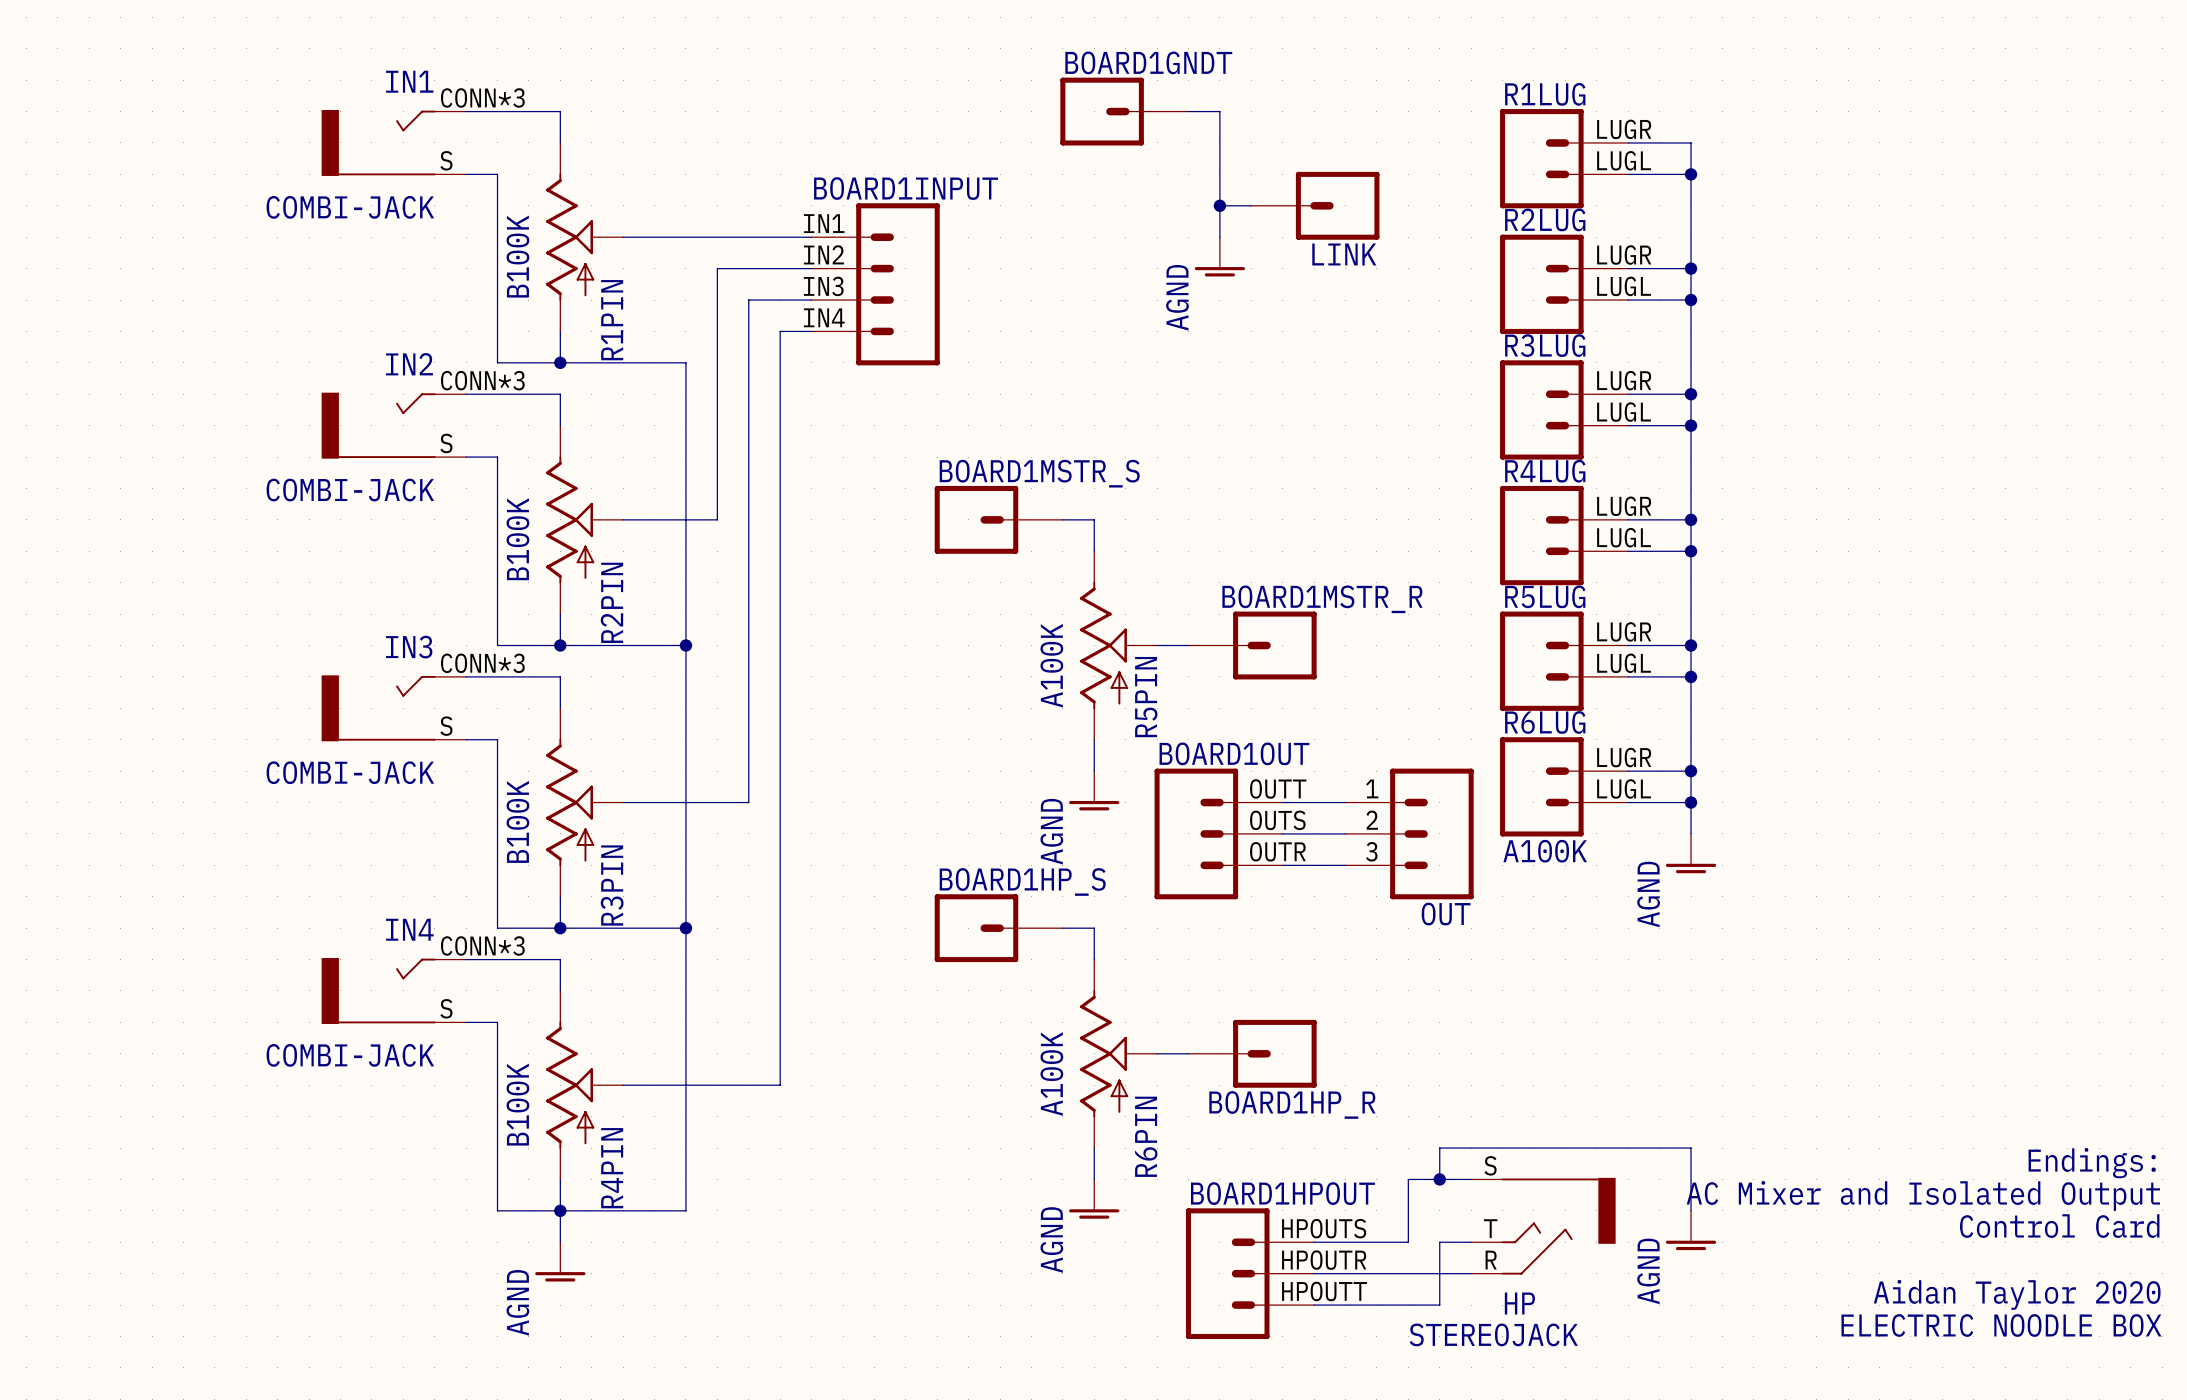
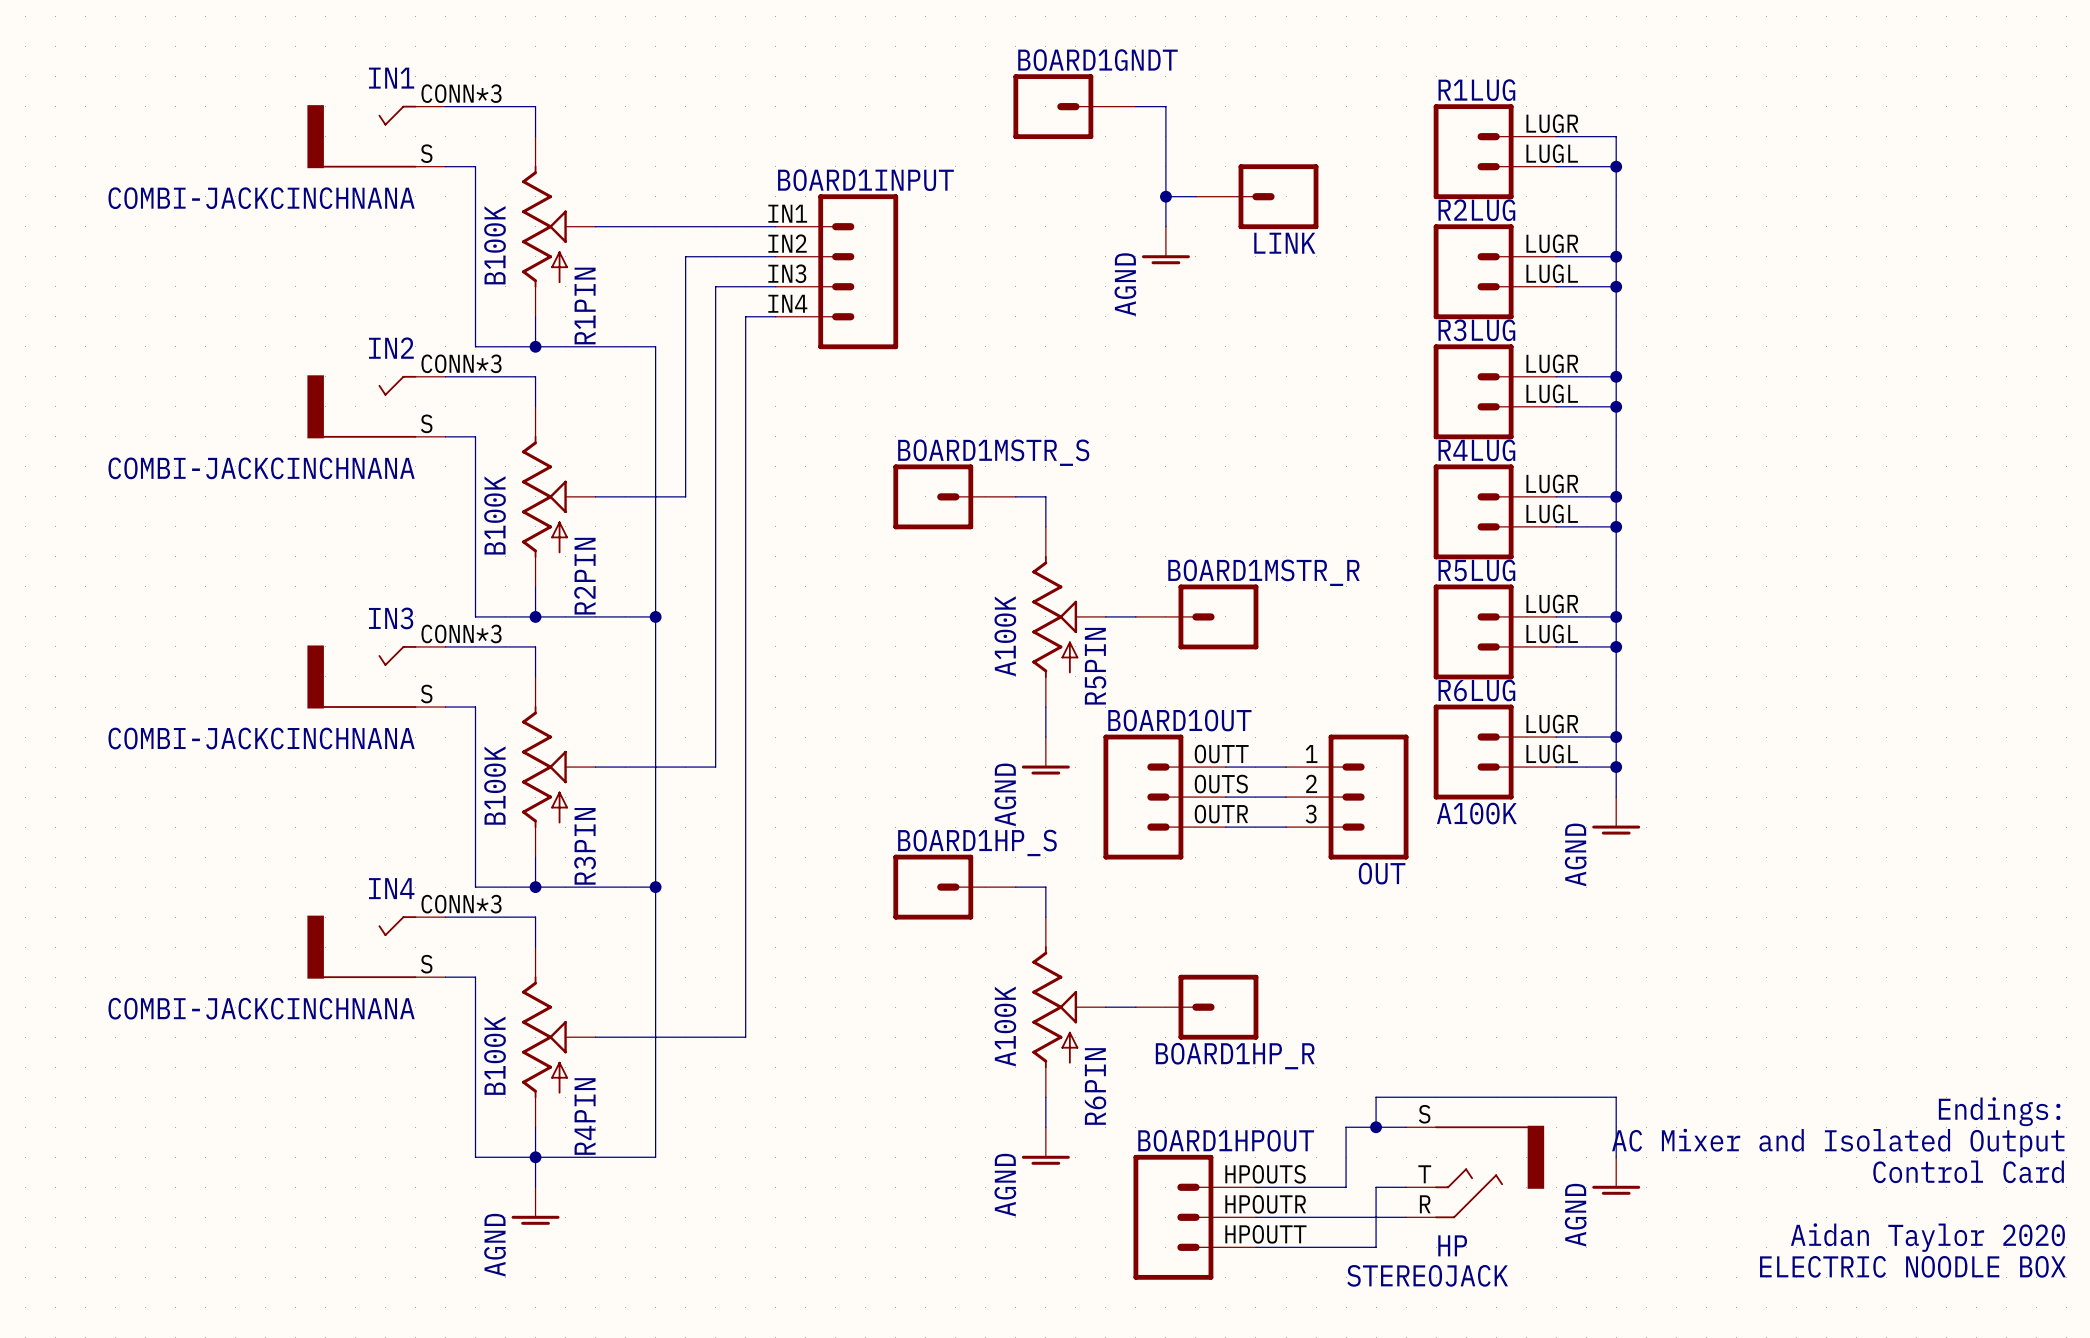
IN1 value: COMBI-JACK (350, 207) -> COMBI-JACKCINCHNANA (261, 198)
IN2 value: COMBI-JACK (350, 490) -> COMBI-JACKCINCHNANA (261, 468)
IN3 value: COMBI-JACK (350, 772) -> COMBI-JACKCINCHNANA (261, 738)
IN4 value: COMBI-JACK (350, 1055) -> COMBI-JACKCINCHNANA (261, 1008)

